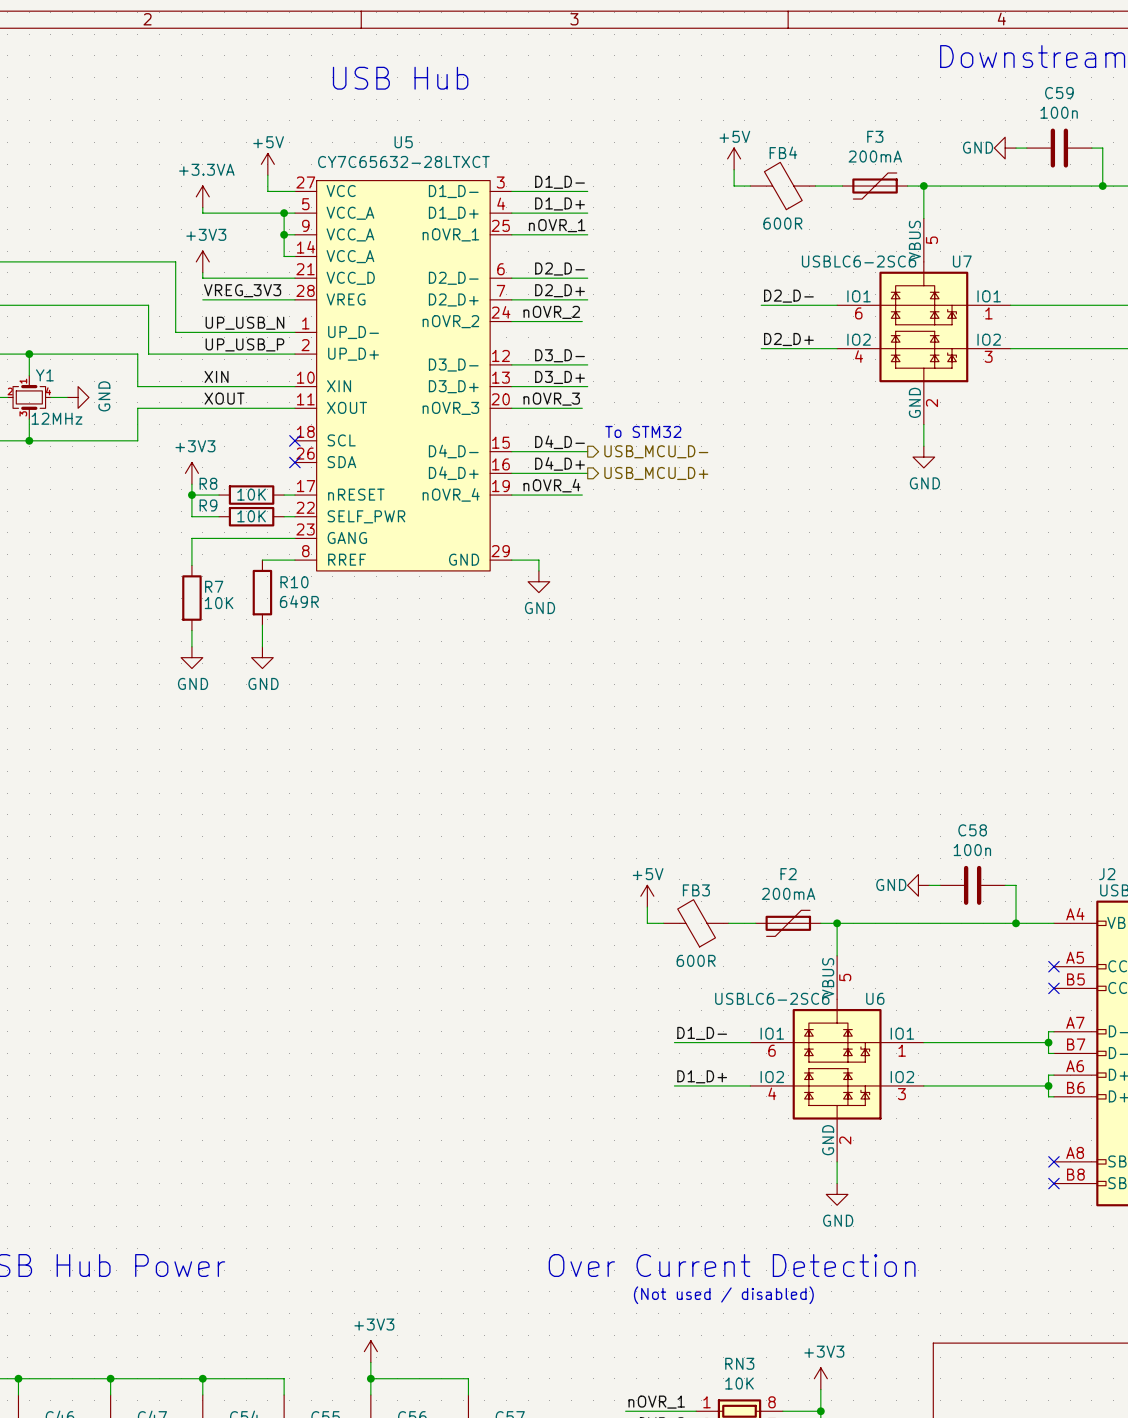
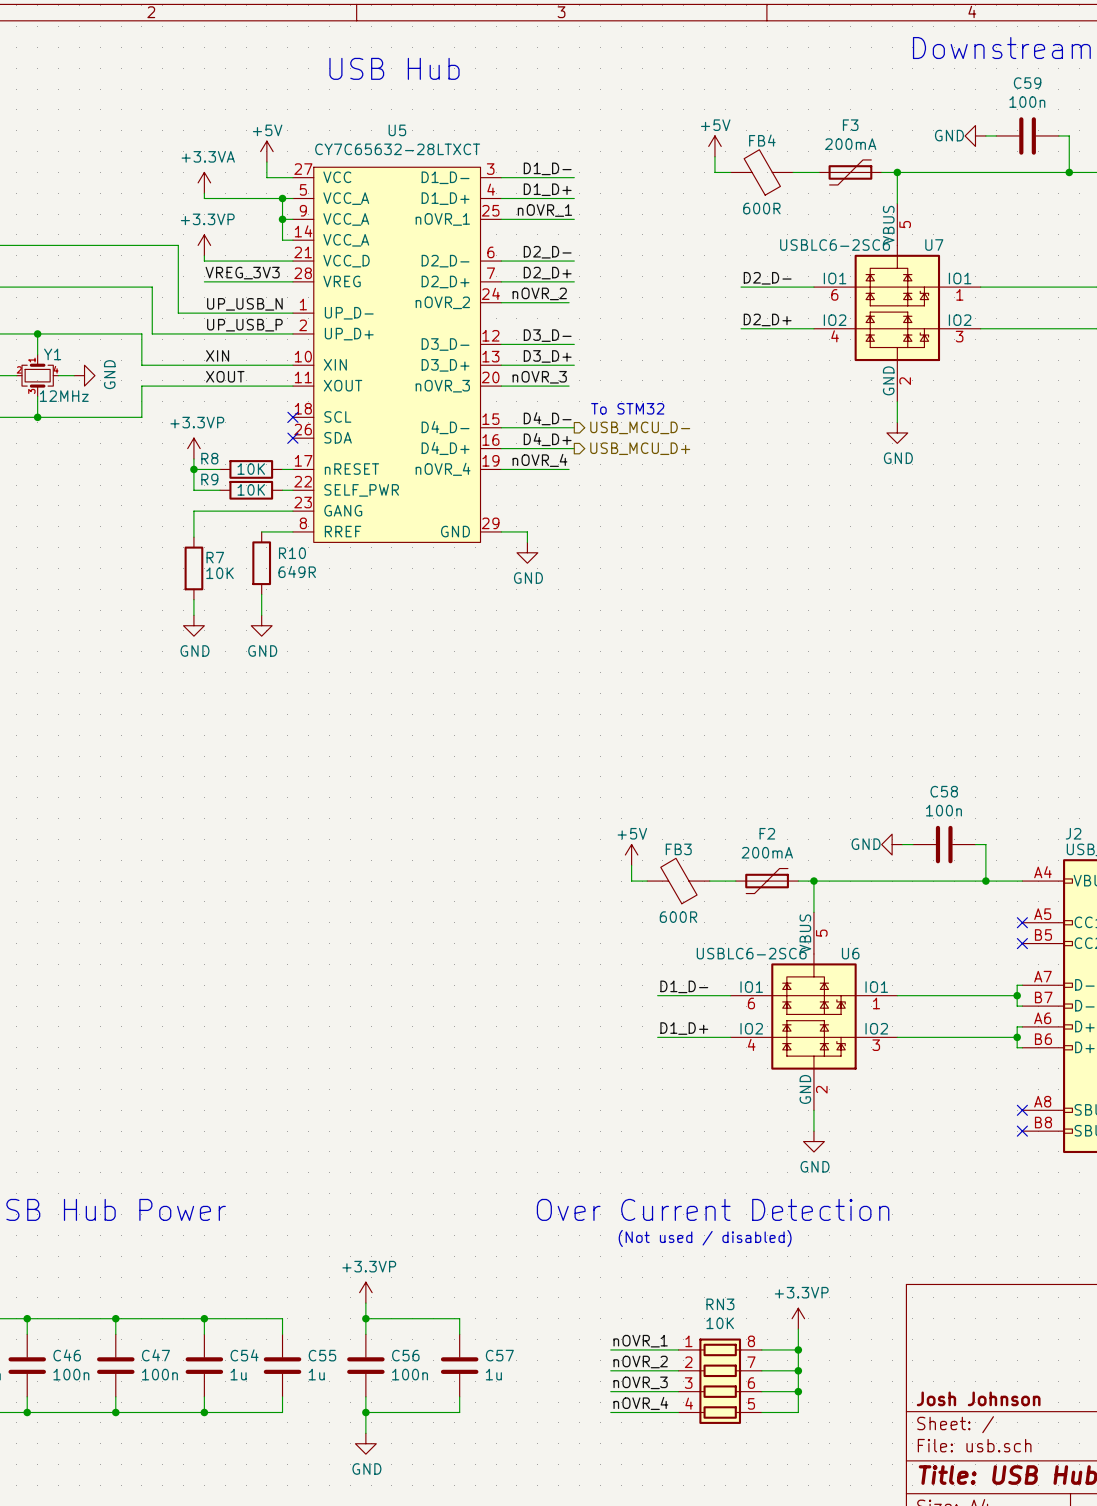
power symbol: +3V3 (202, 261) -> +3.3VP (204, 245)
power symbol: +3V3 (191, 473) -> +3.3VP (193, 448)
power symbol: +3V3 (370, 1351) -> +3.3VP (365, 1292)
power symbol: +3V3 (820, 1378) -> +3.3VP (798, 1318)

